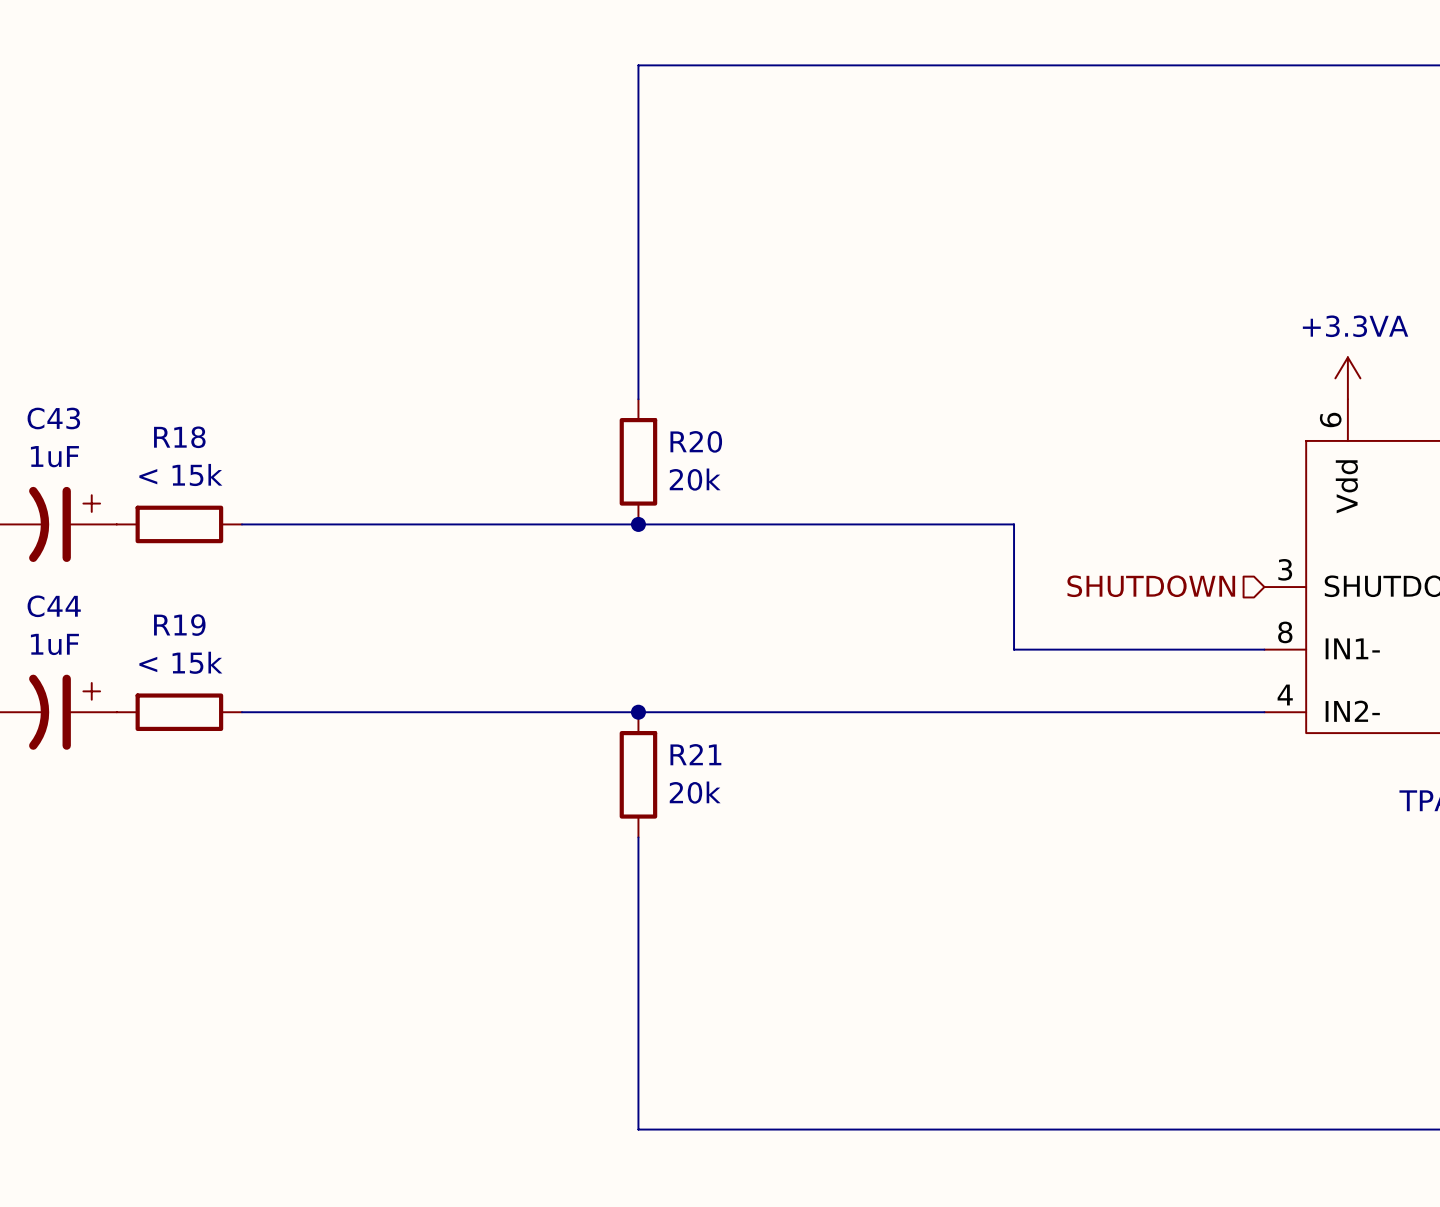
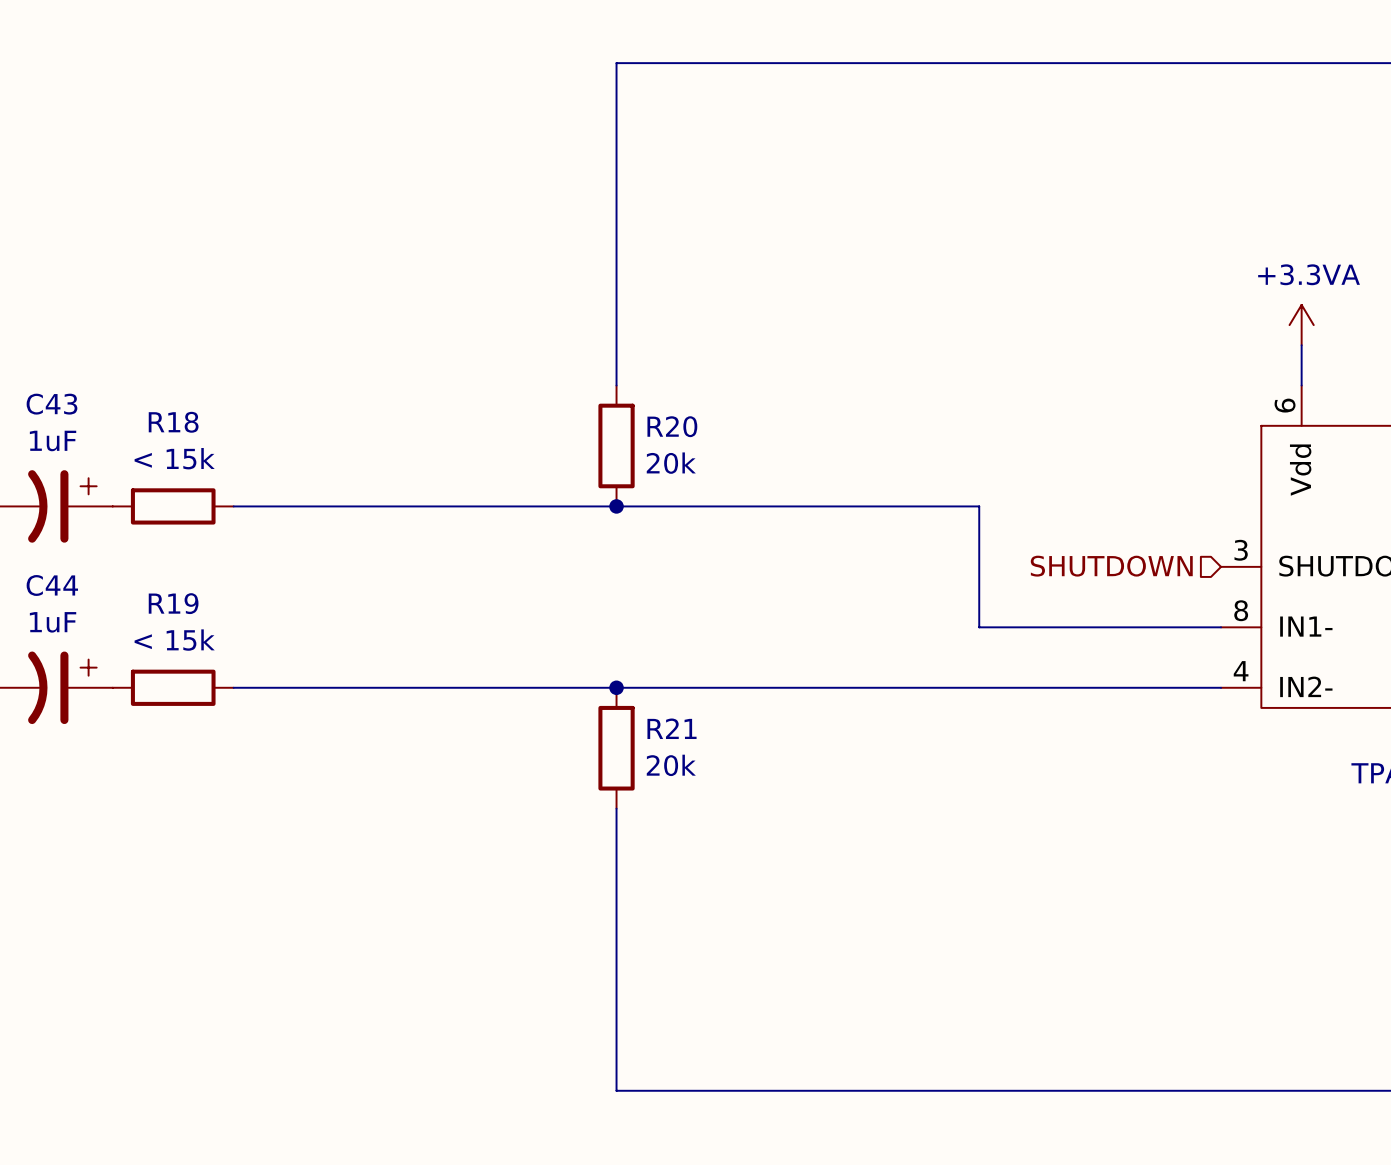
power symbol position: +3.3VA (1347, 378) -> +3.3VA (1301, 325)

